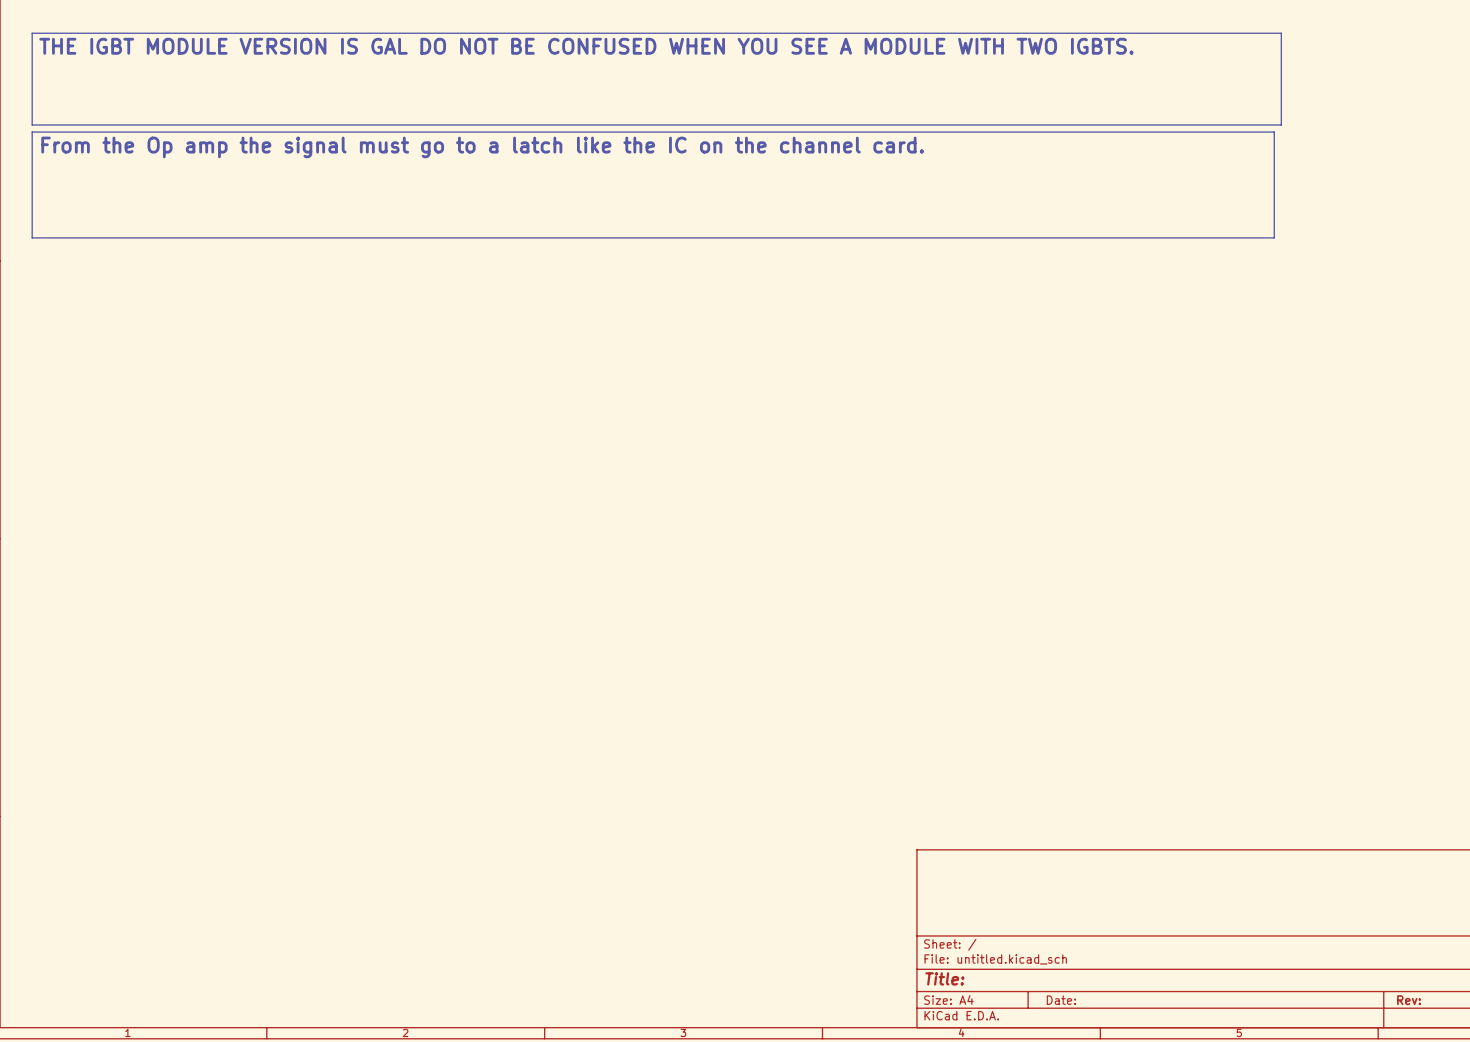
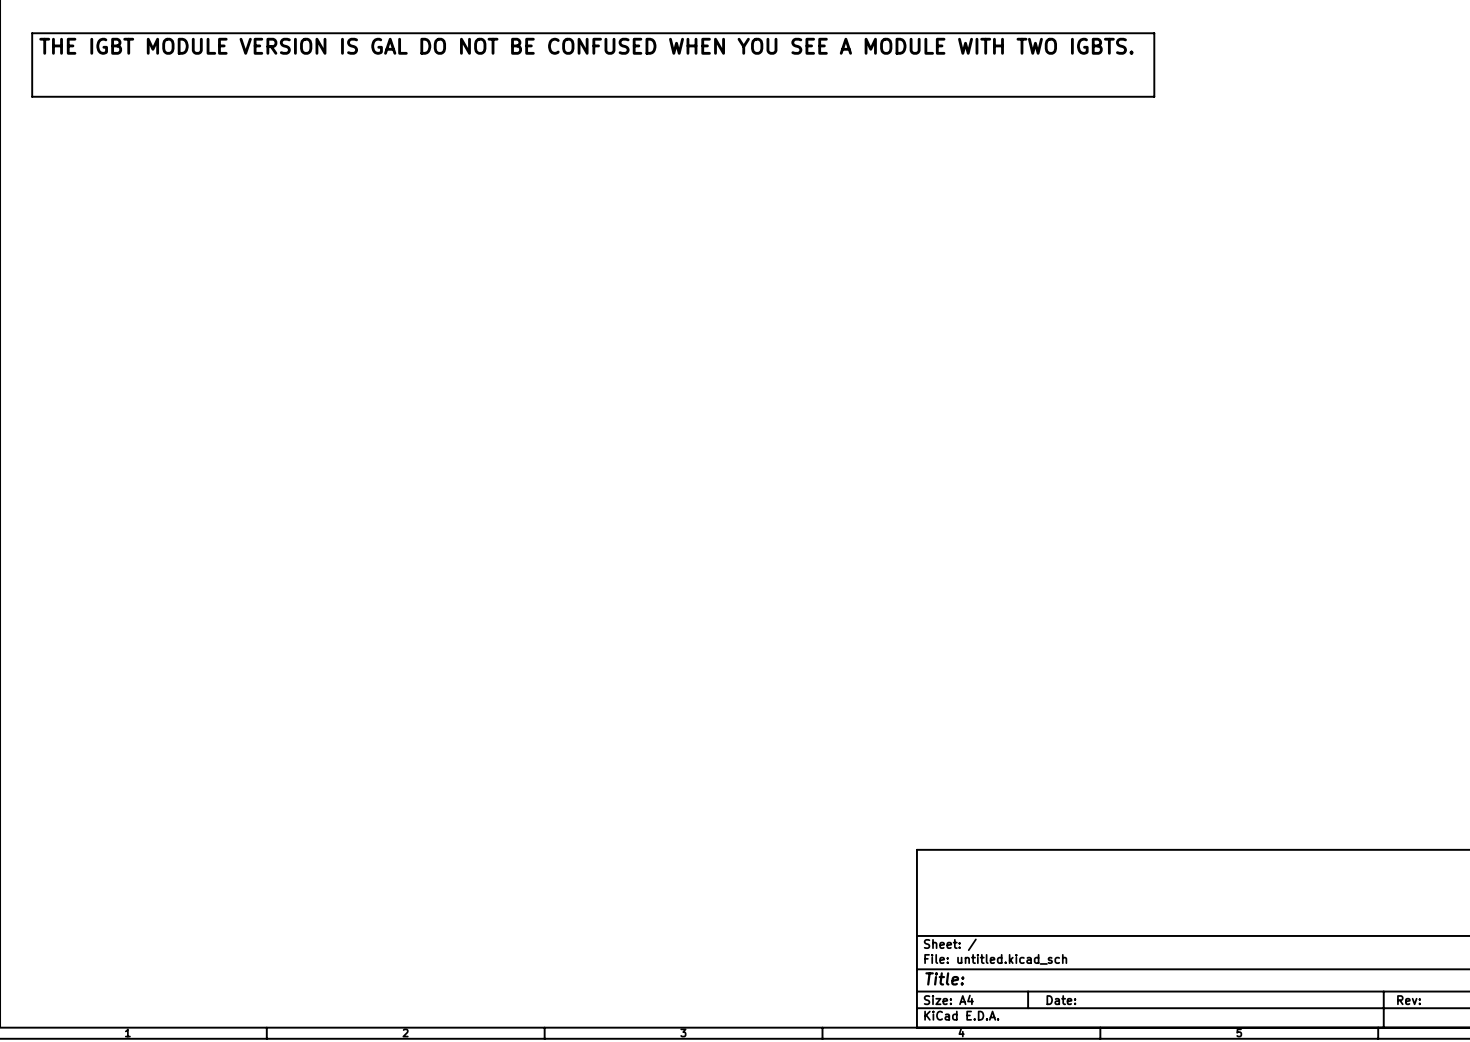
line: (1154, 33) (1281, 33) (1281, 124) (32, 124) (32, 96) -> (1154, 33) (1154, 96) (32, 96)
line: (32, 132) (32, 237) (1274, 237) (1274, 132) (32, 132) -> none
text: From the Op amp the signal must go to a latch like the IC on the channel card. (482, 147) -> none

